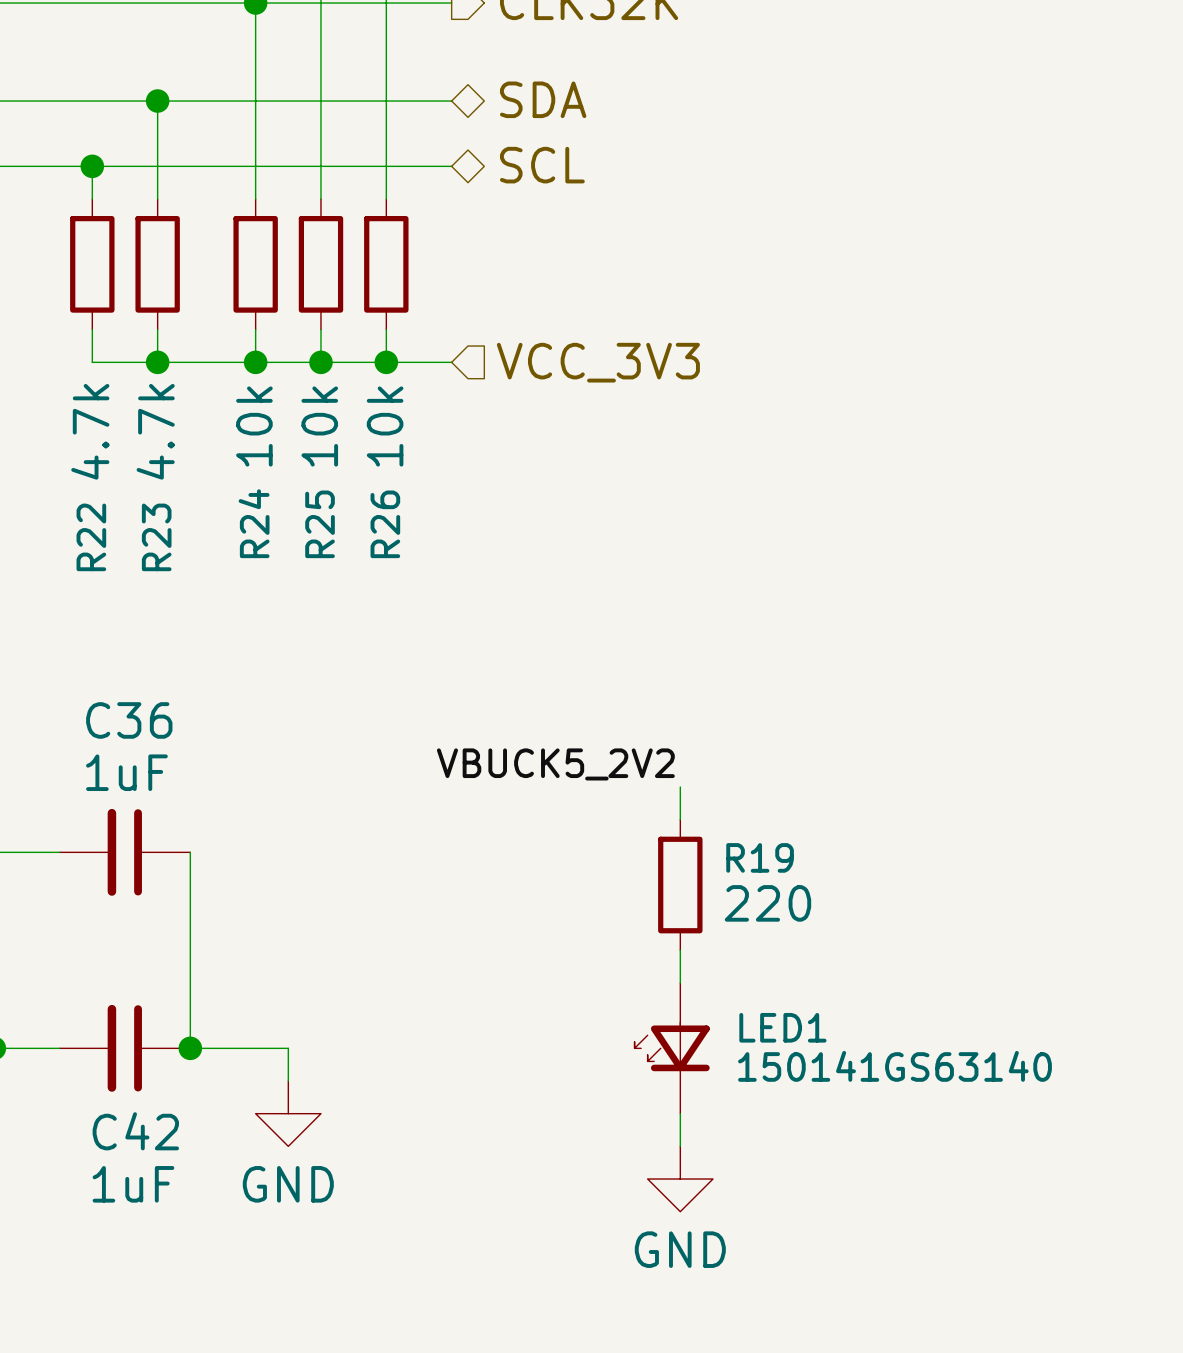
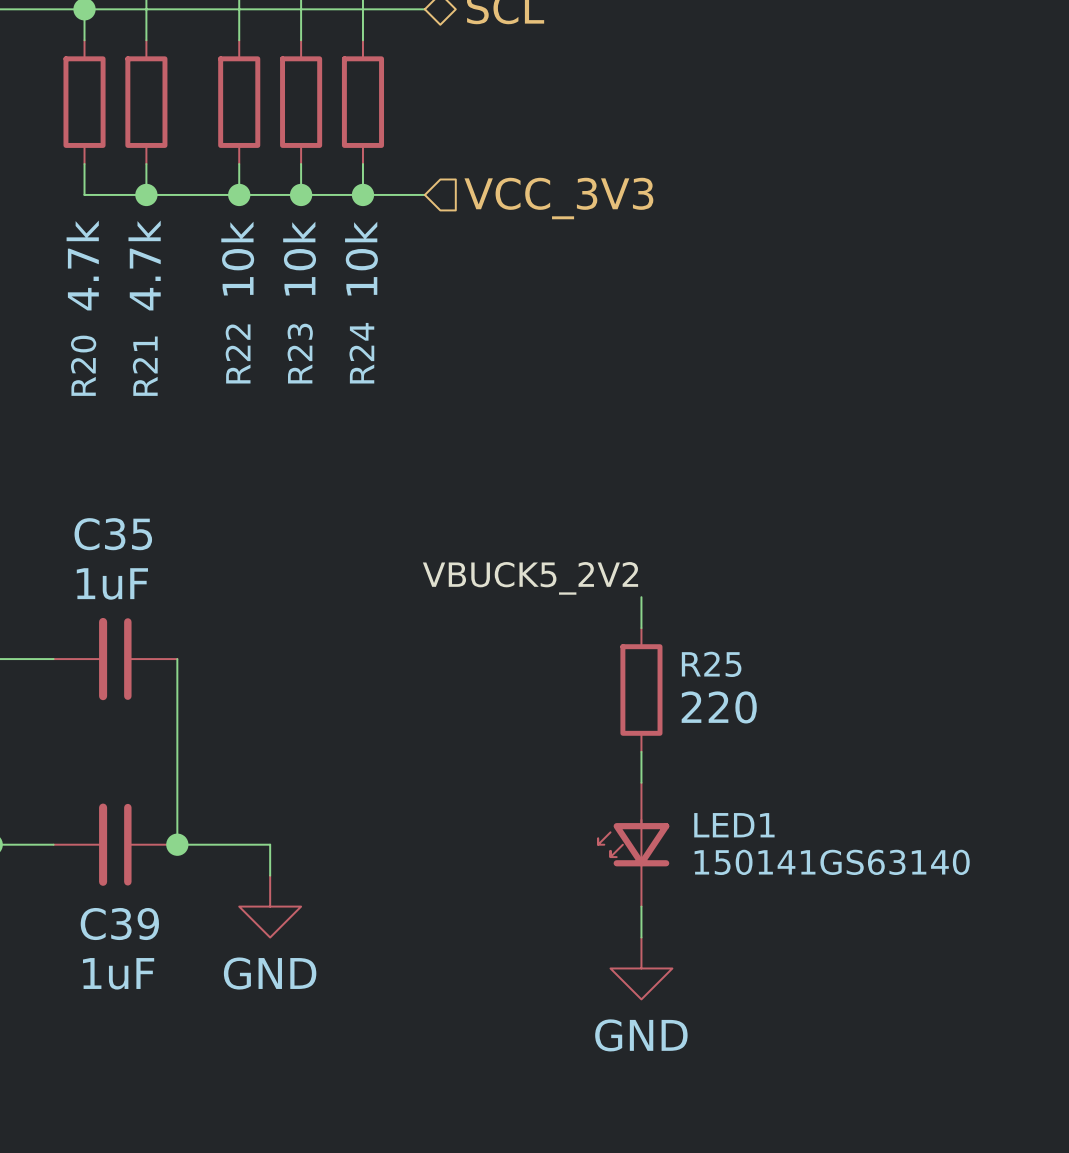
R24 name: R24 (254, 523) -> R22 (238, 353)
R25 name: R25 (320, 524) -> R23 (300, 353)
R26 name: R26 (385, 524) -> R24 (361, 353)
R22 name: R22 (91, 537) -> R20 (83, 365)
R23 name: R23 (156, 537) -> R21 (145, 366)
C36 name: C36 (129, 720) -> C35 (113, 534)
R19 name: R19 (760, 857) -> R25 (711, 664)
C42 name: C42 (135, 1131) -> C39 (119, 924)

